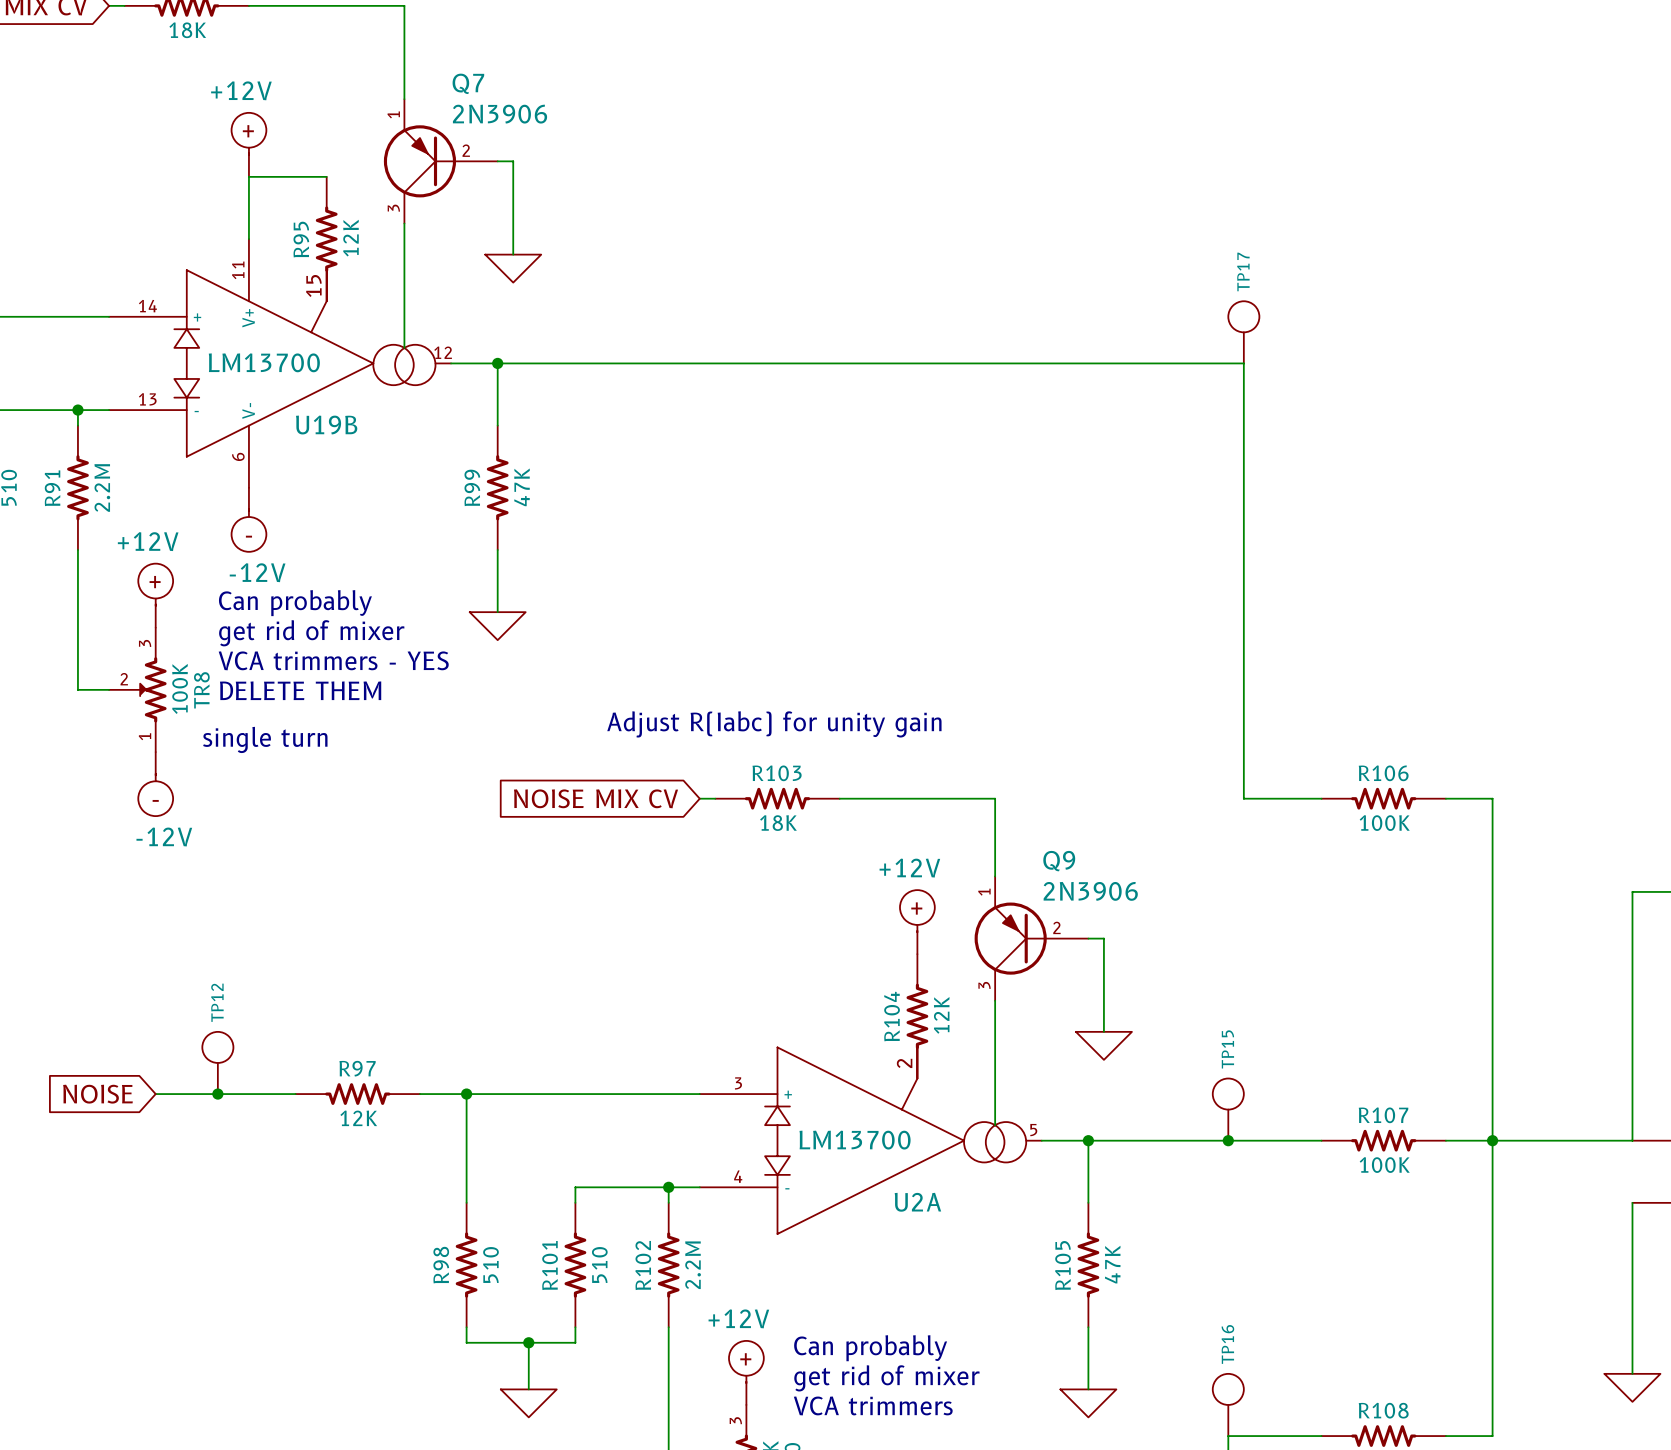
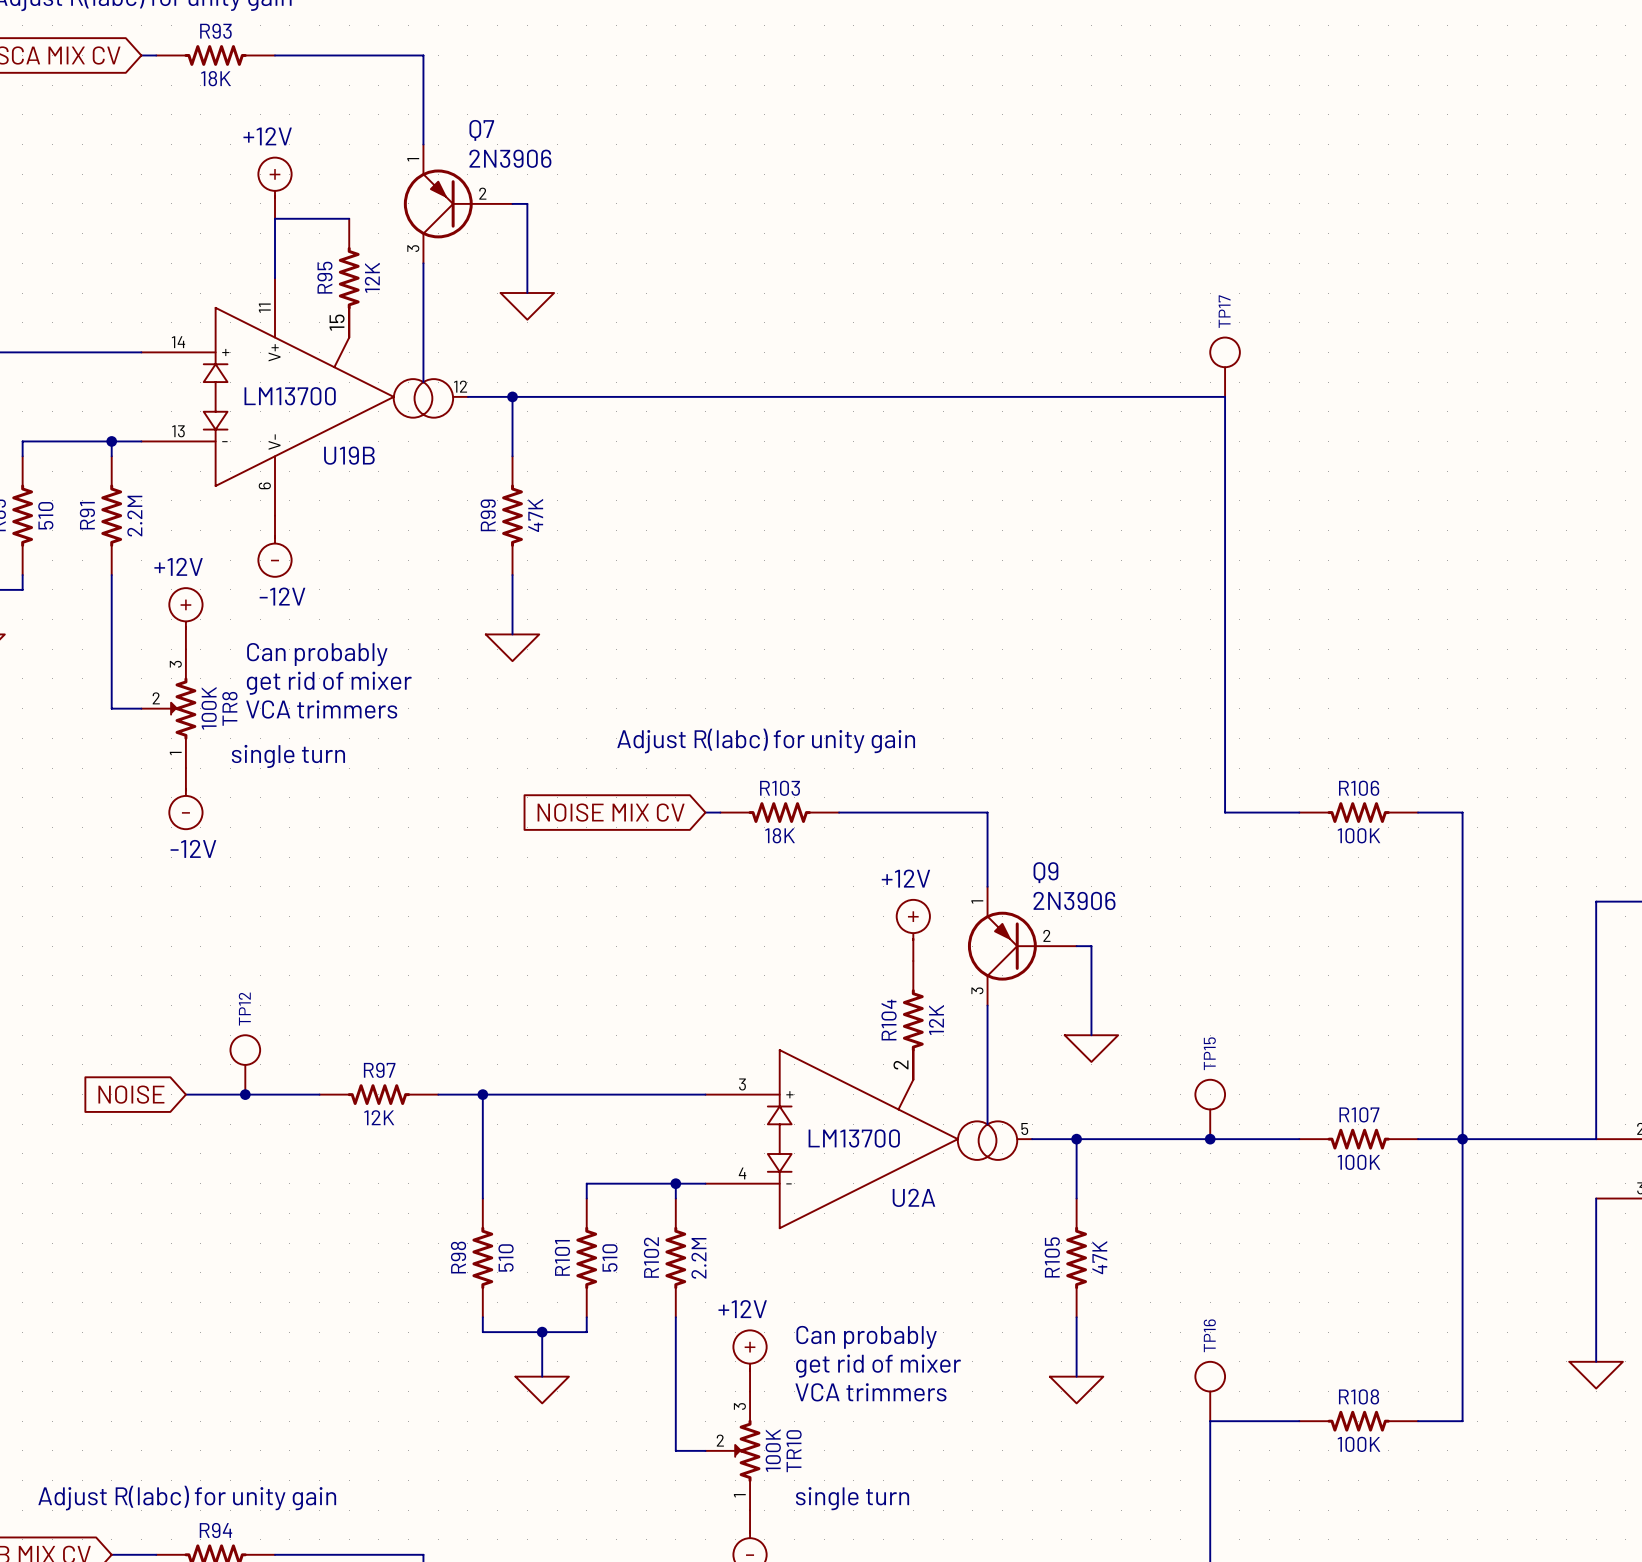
text: Can probably (295, 603) -> none
text: get rid of mixer (311, 633) -> Can probably (317, 654)
text: VCA trimmers - YES (333, 660) -> get rid of mixer (329, 683)
text: DELETE THEM (300, 690) -> VCA trimmers (321, 709)

